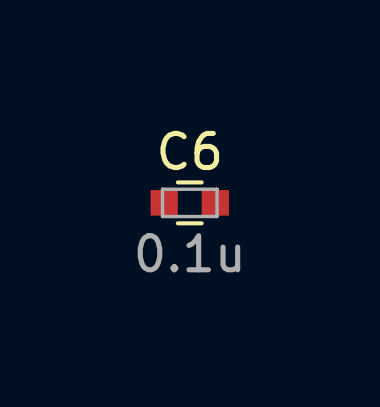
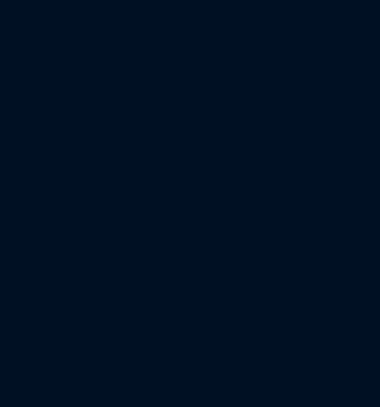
C6: 0.1u (189, 202) -> none

